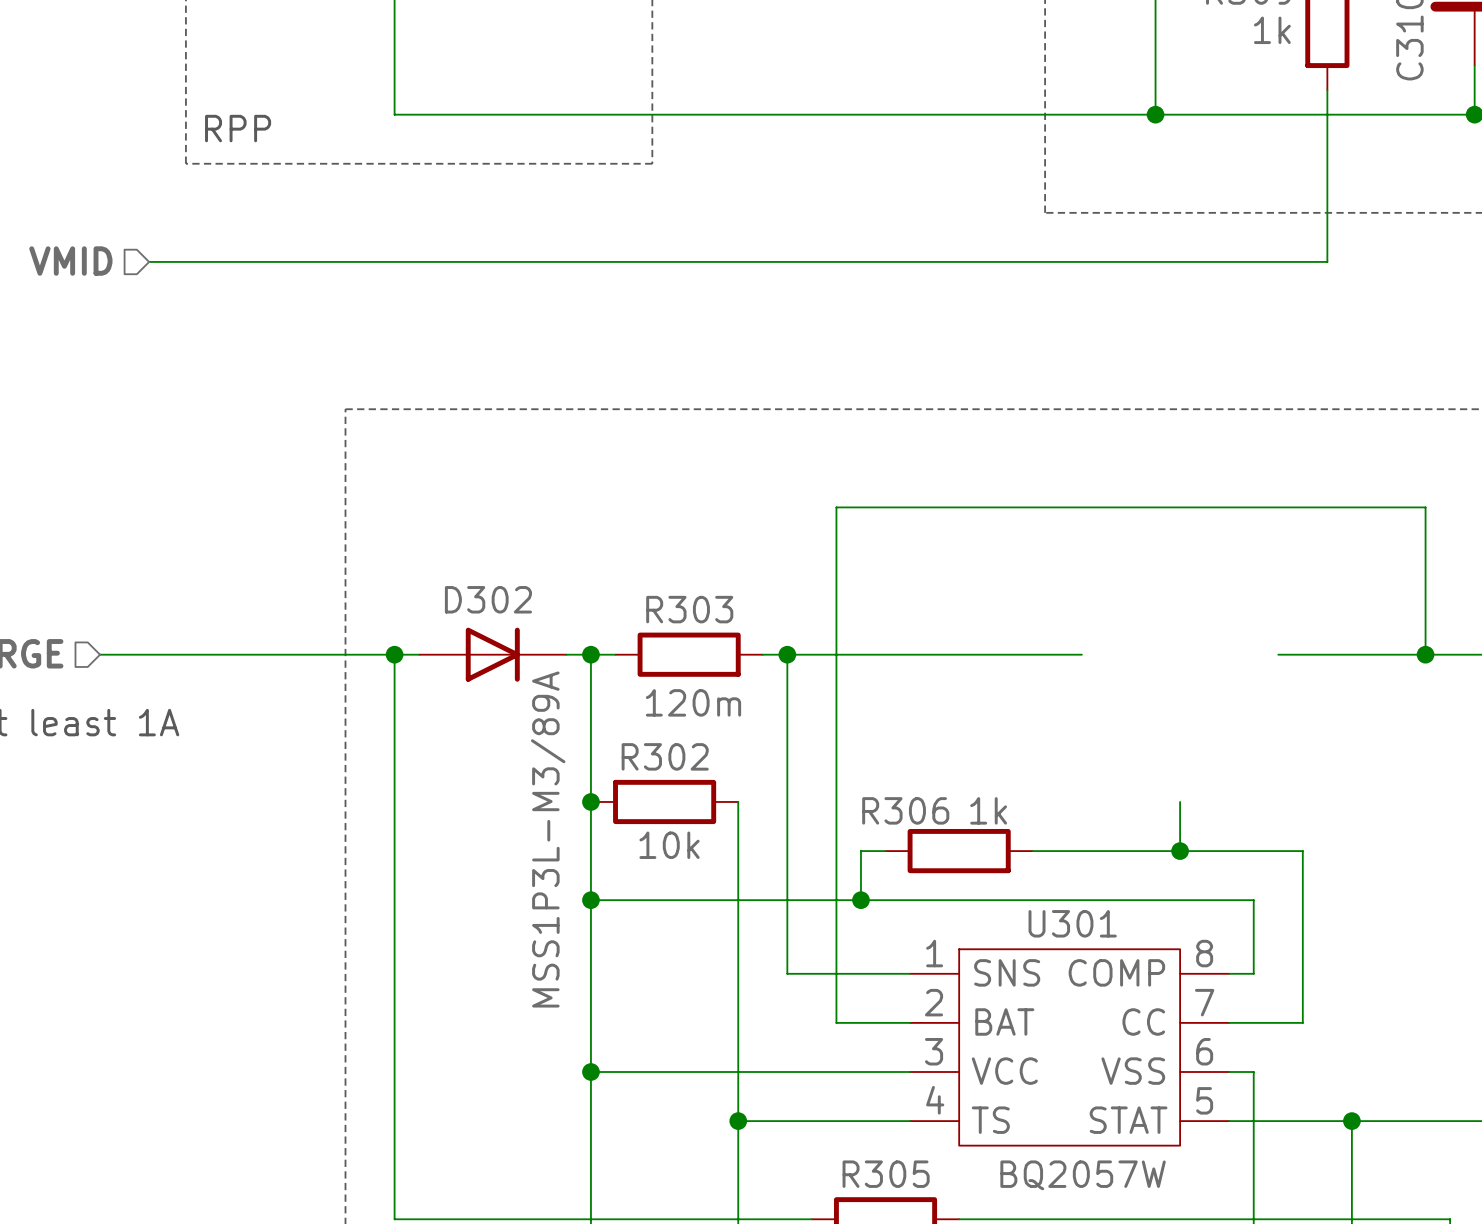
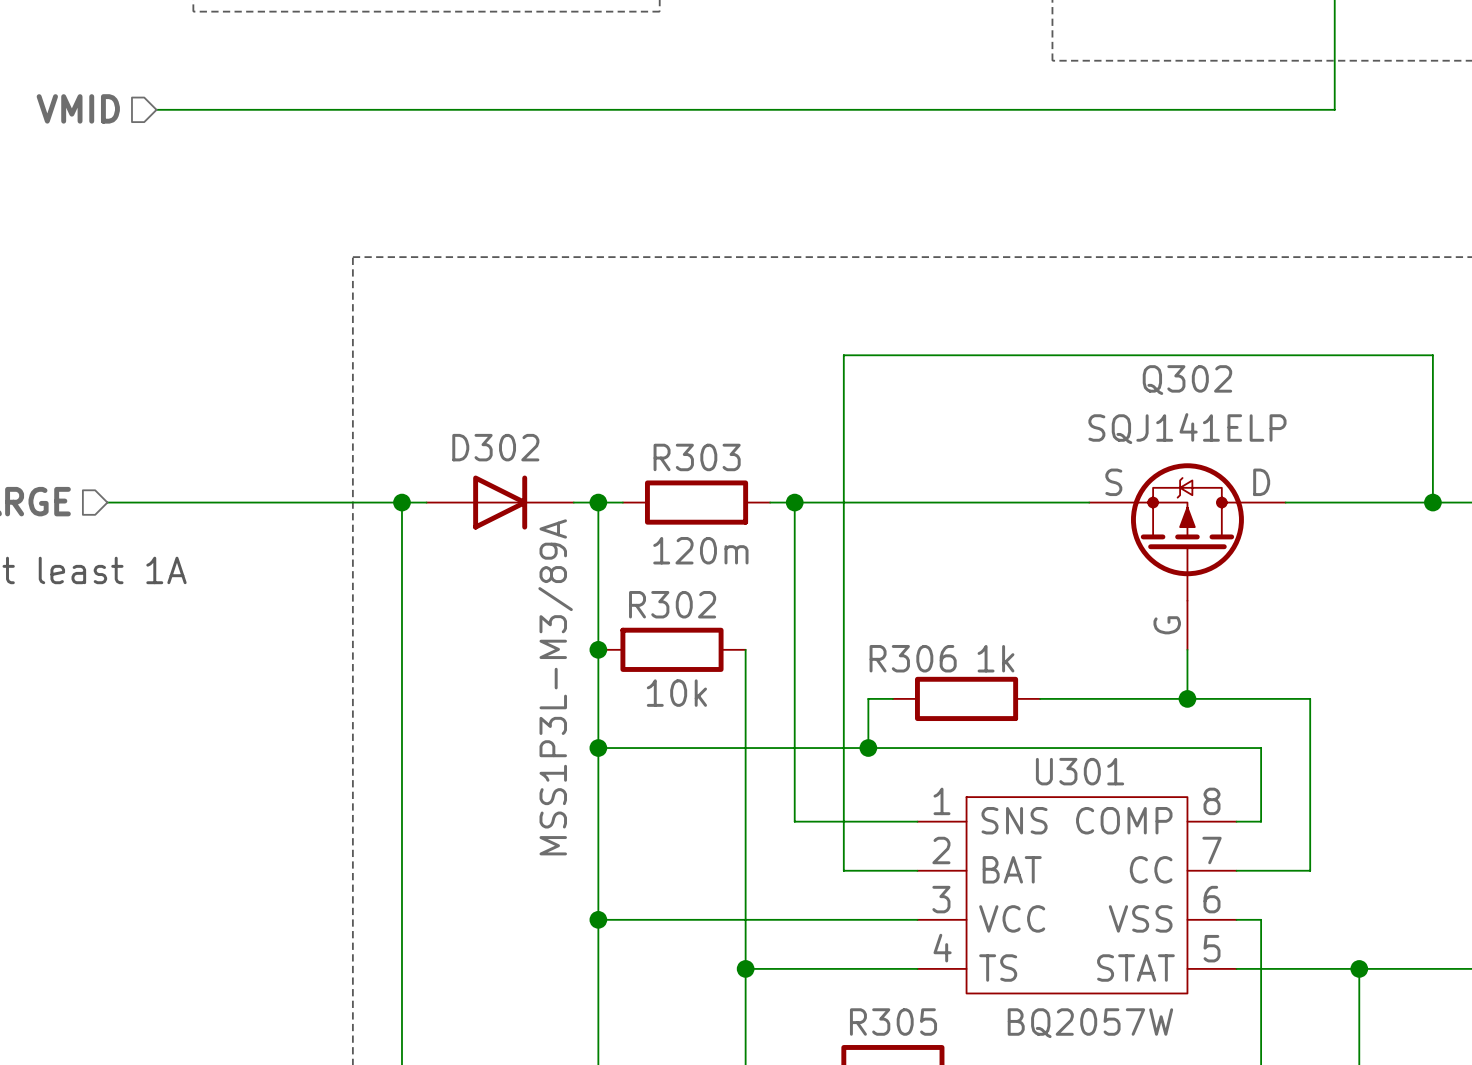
Q302: none -> SQJ141ELP (1187, 556)

